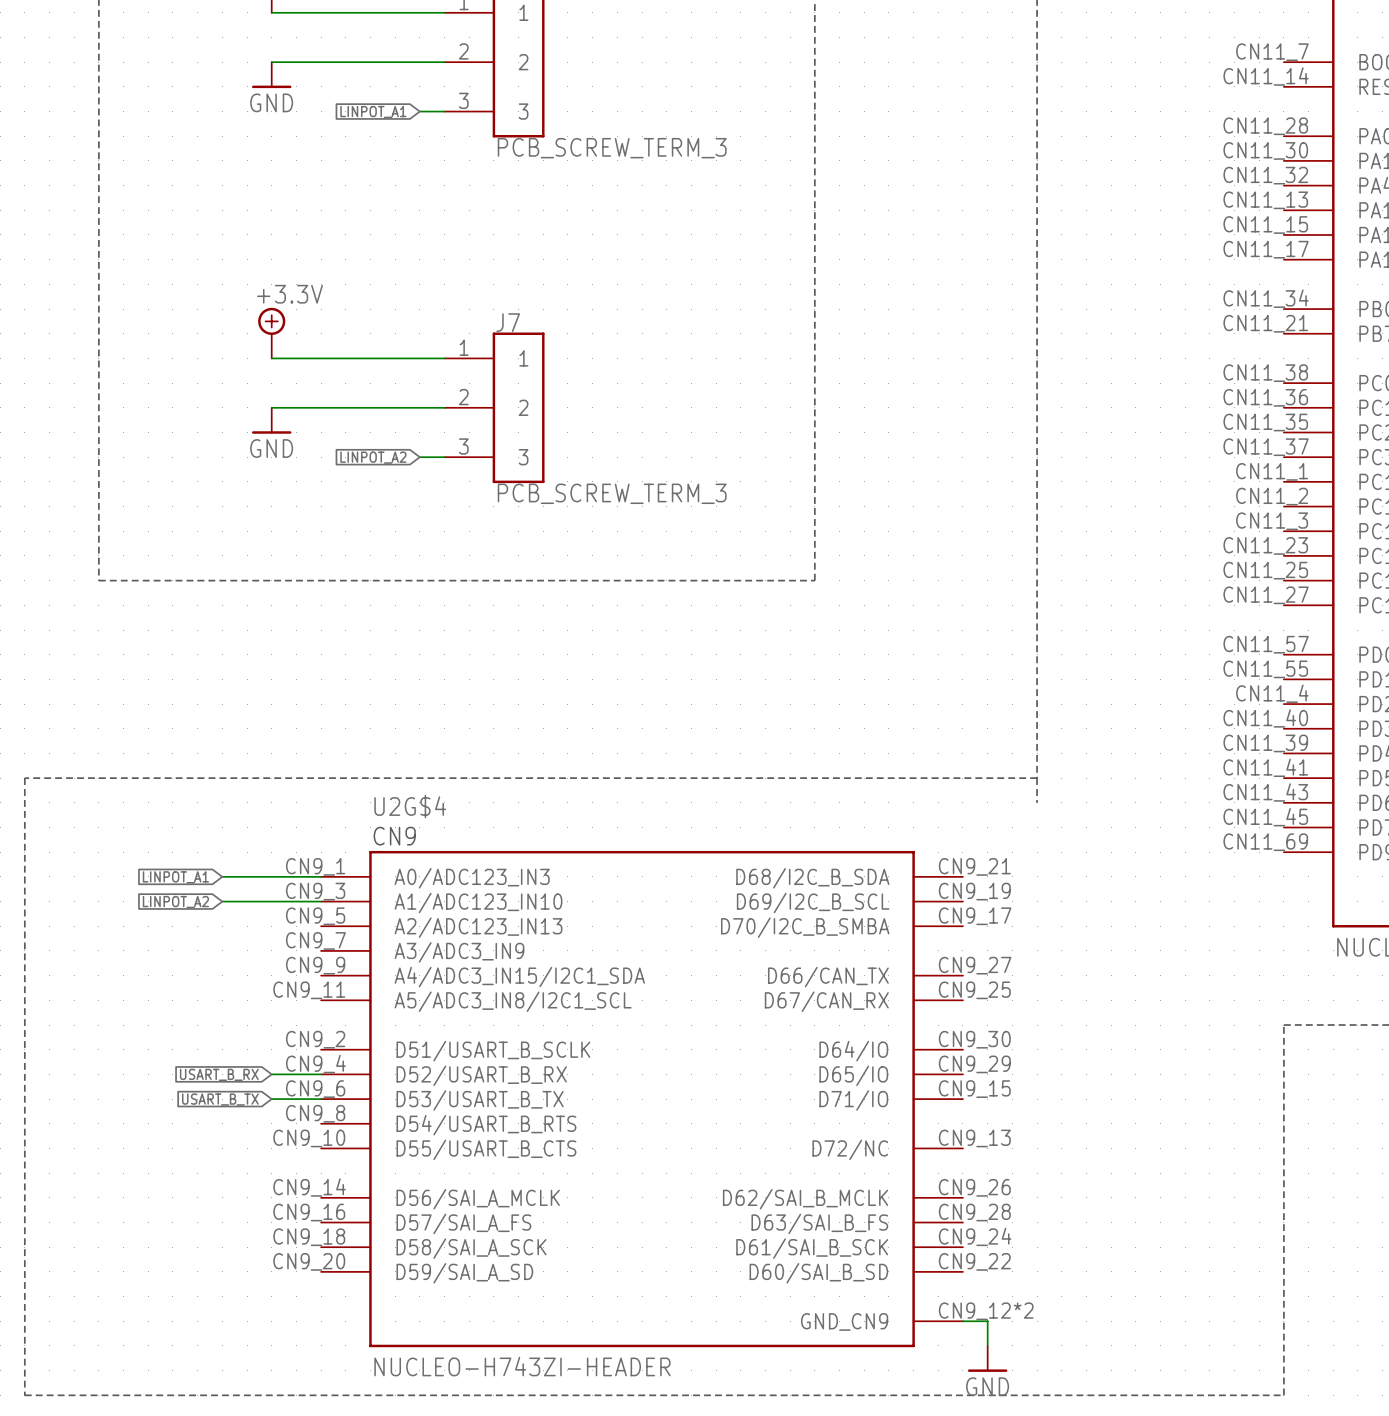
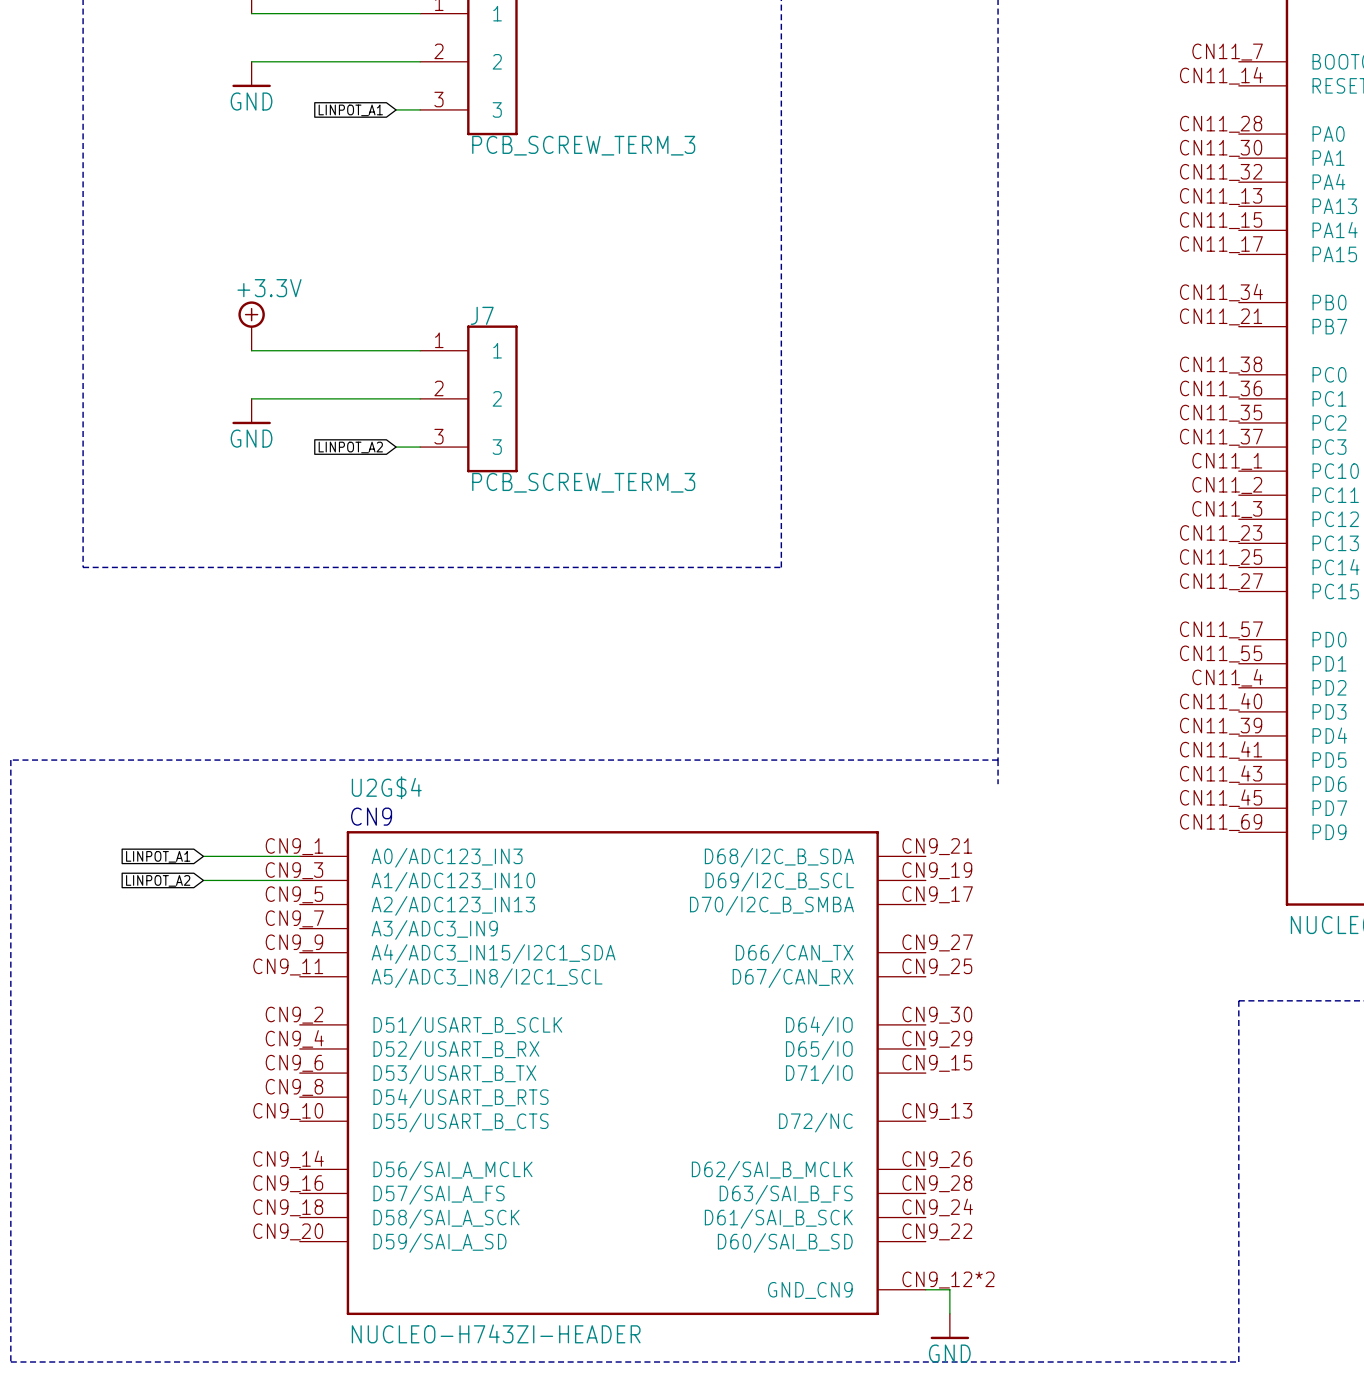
global label: USART_B_RX (219, 1074) -> none
wire: (271, 1074) (321, 1074) -> none
global label: USART_B_TX (220, 1099) -> none
wire: (271, 1099) (321, 1099) -> none

